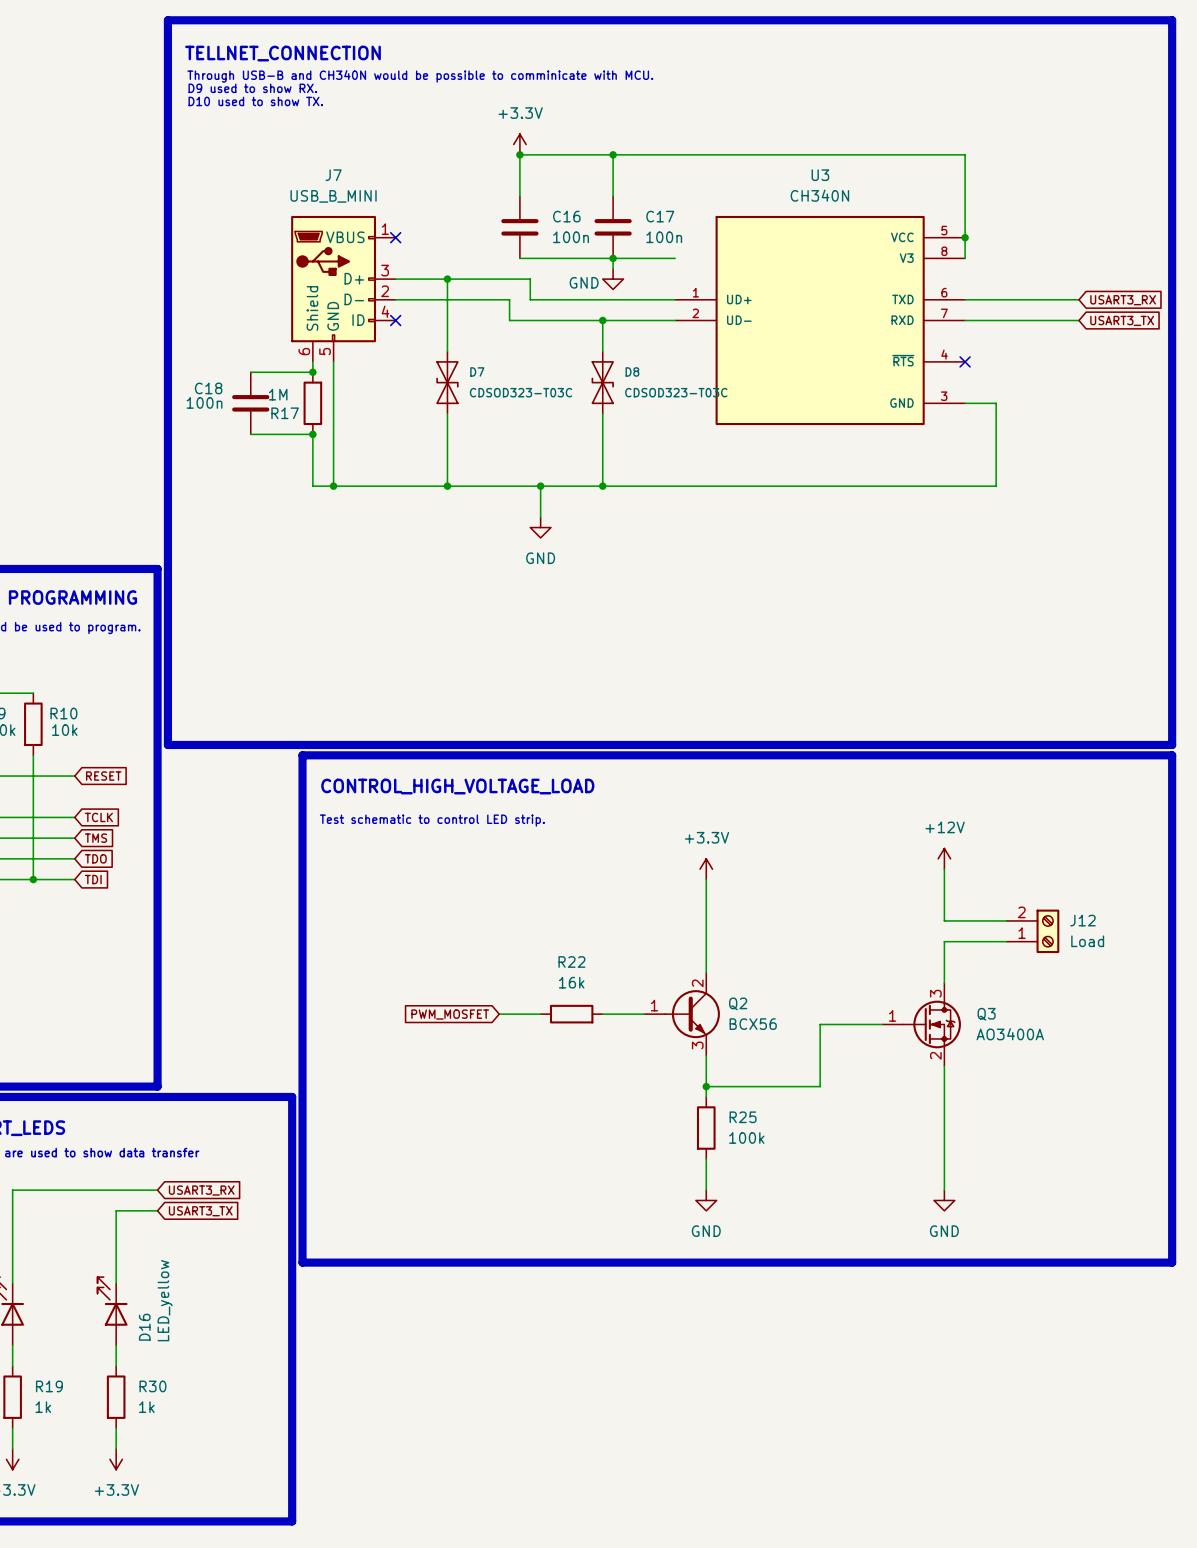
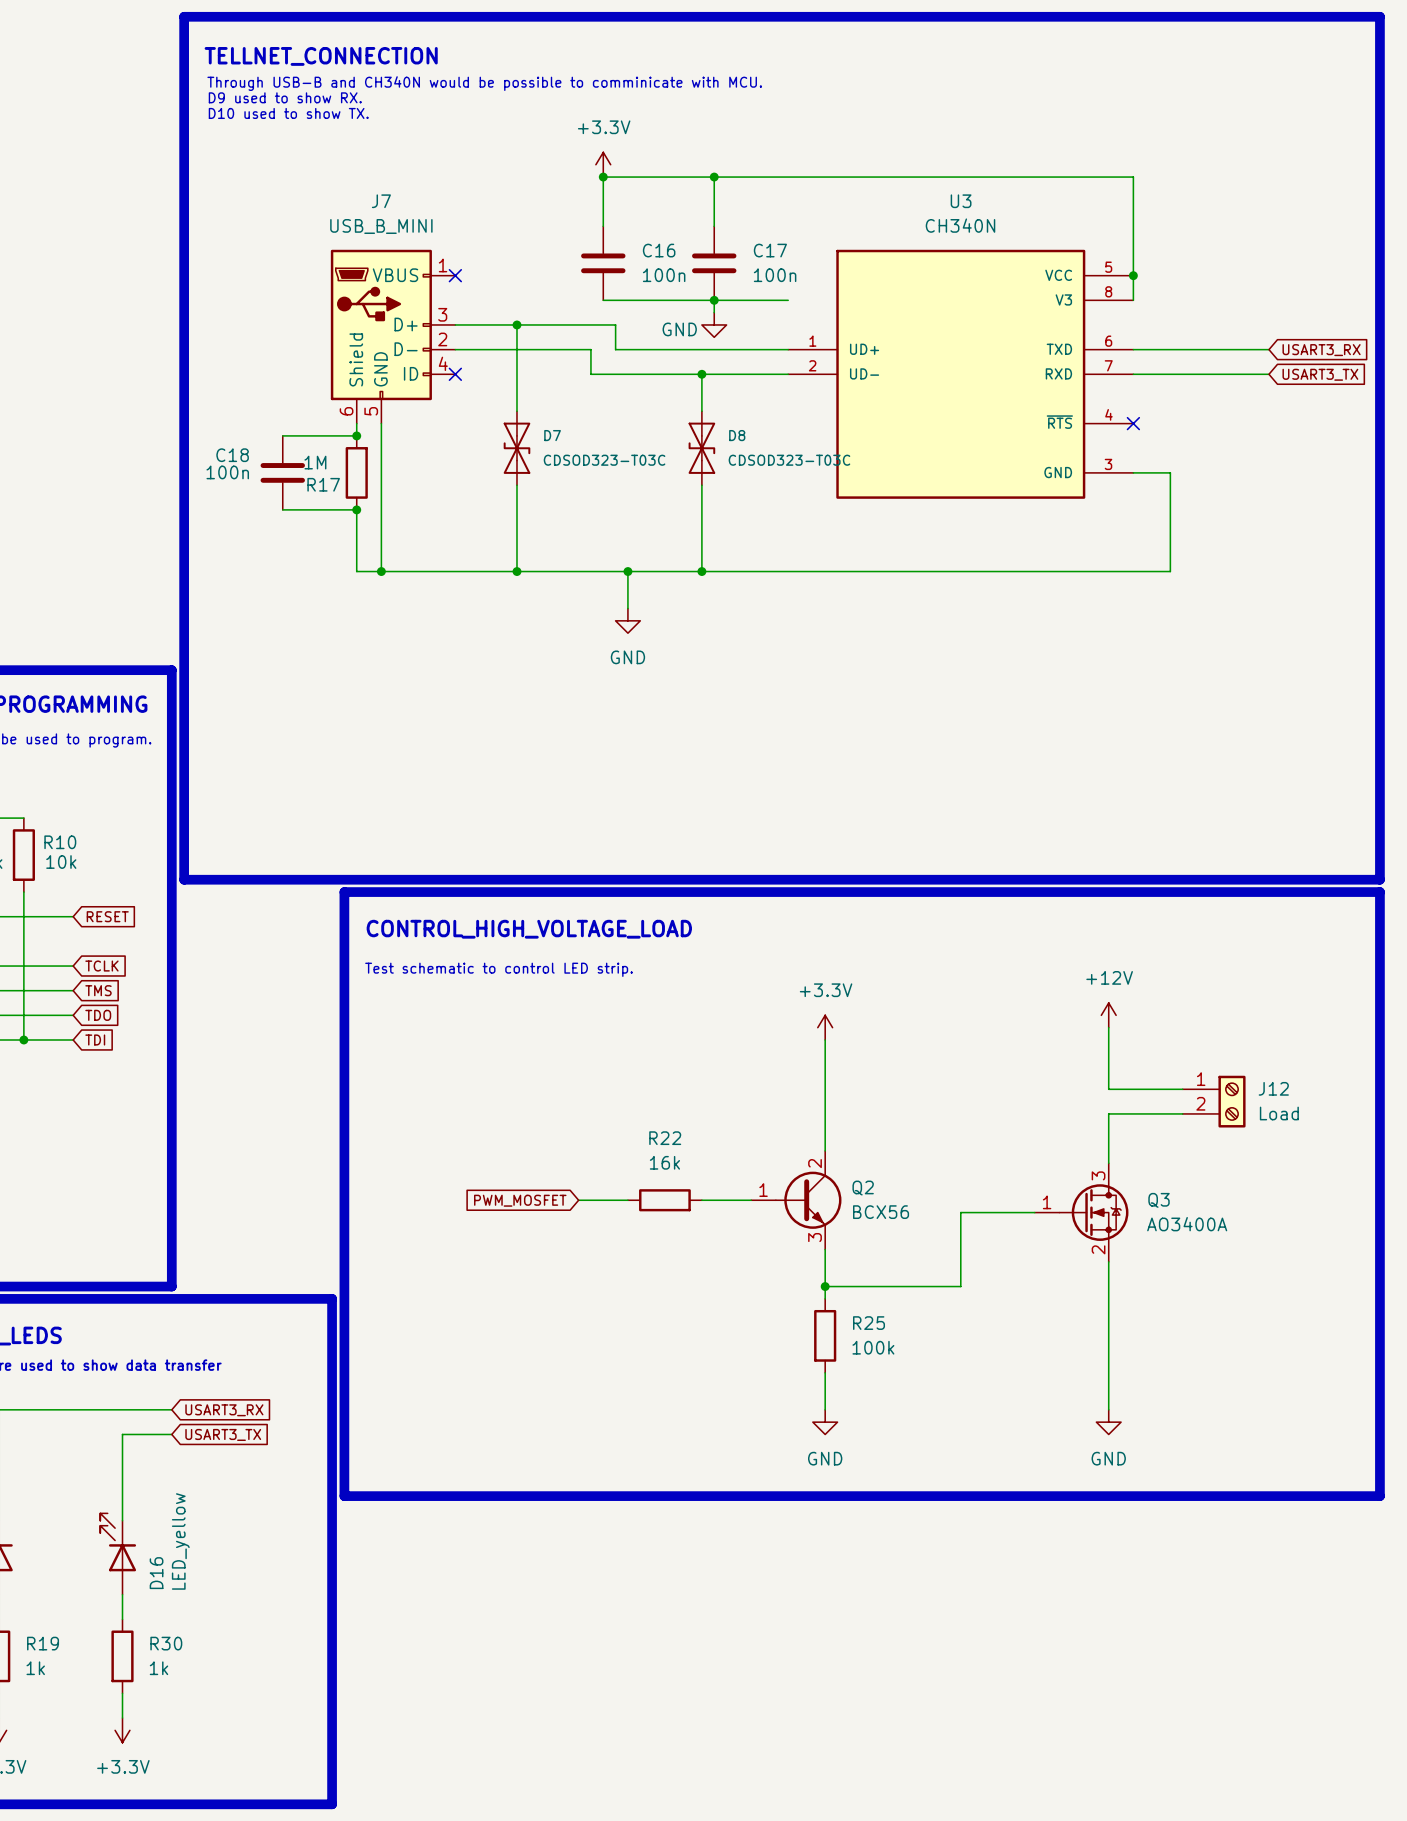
J12 pin number: 2 (1021, 912) -> 1 (1201, 1079)
J12 pin number: 1 (1022, 933) -> 2 (1200, 1103)

